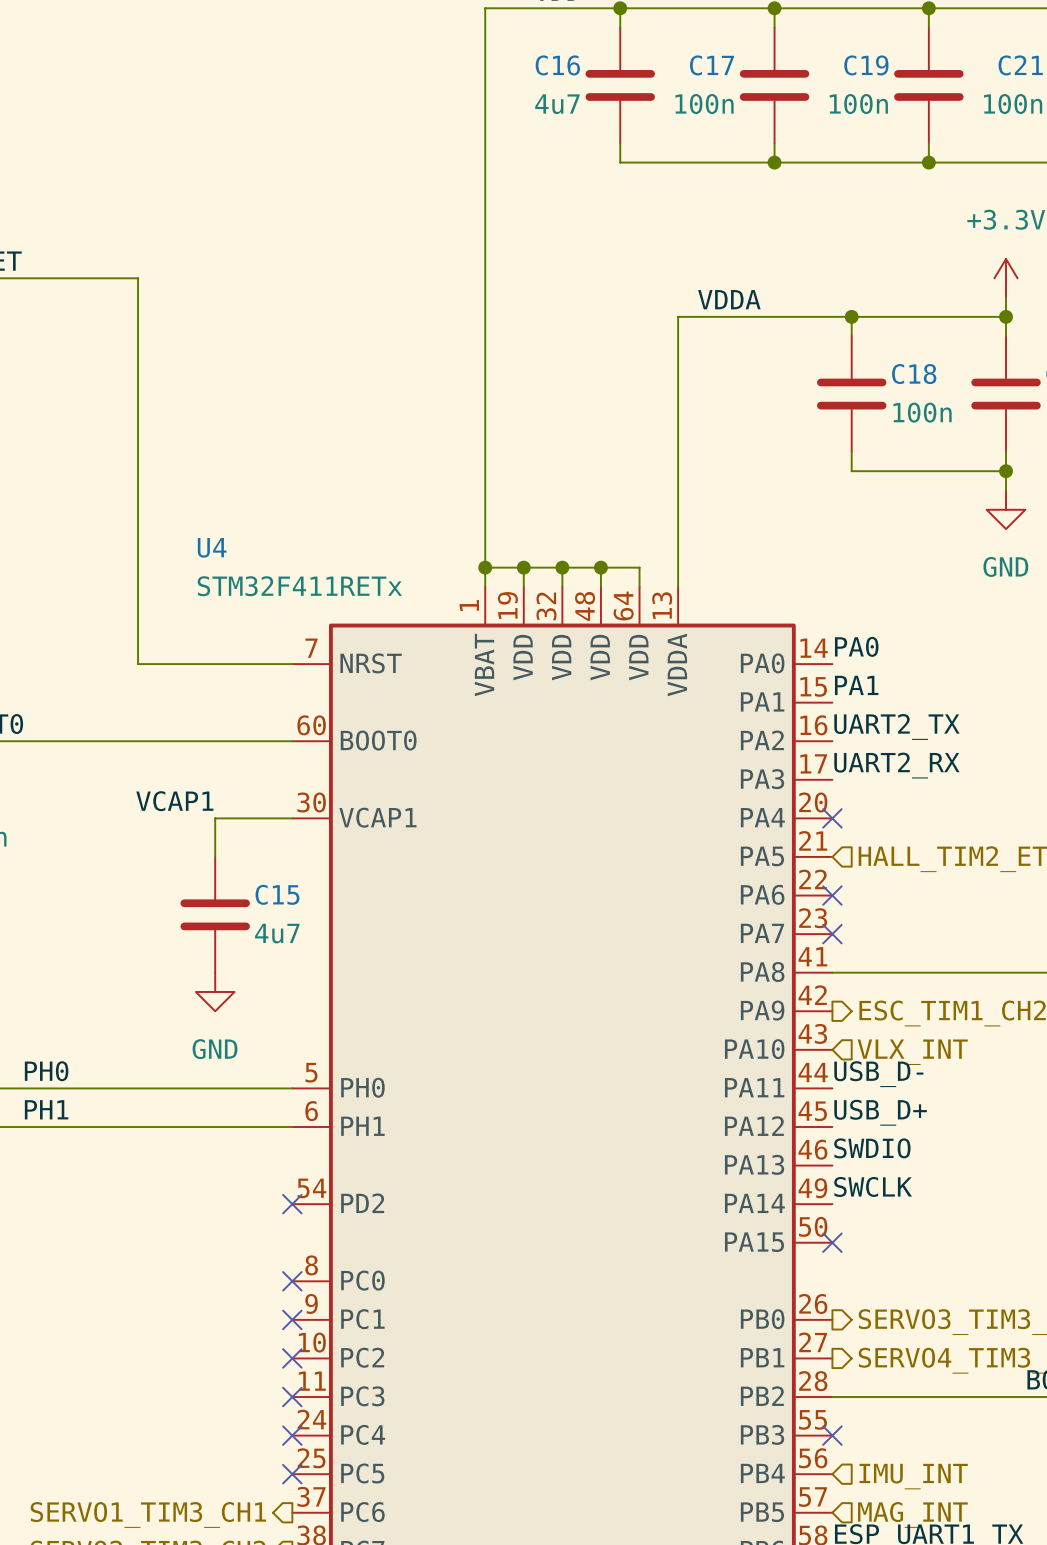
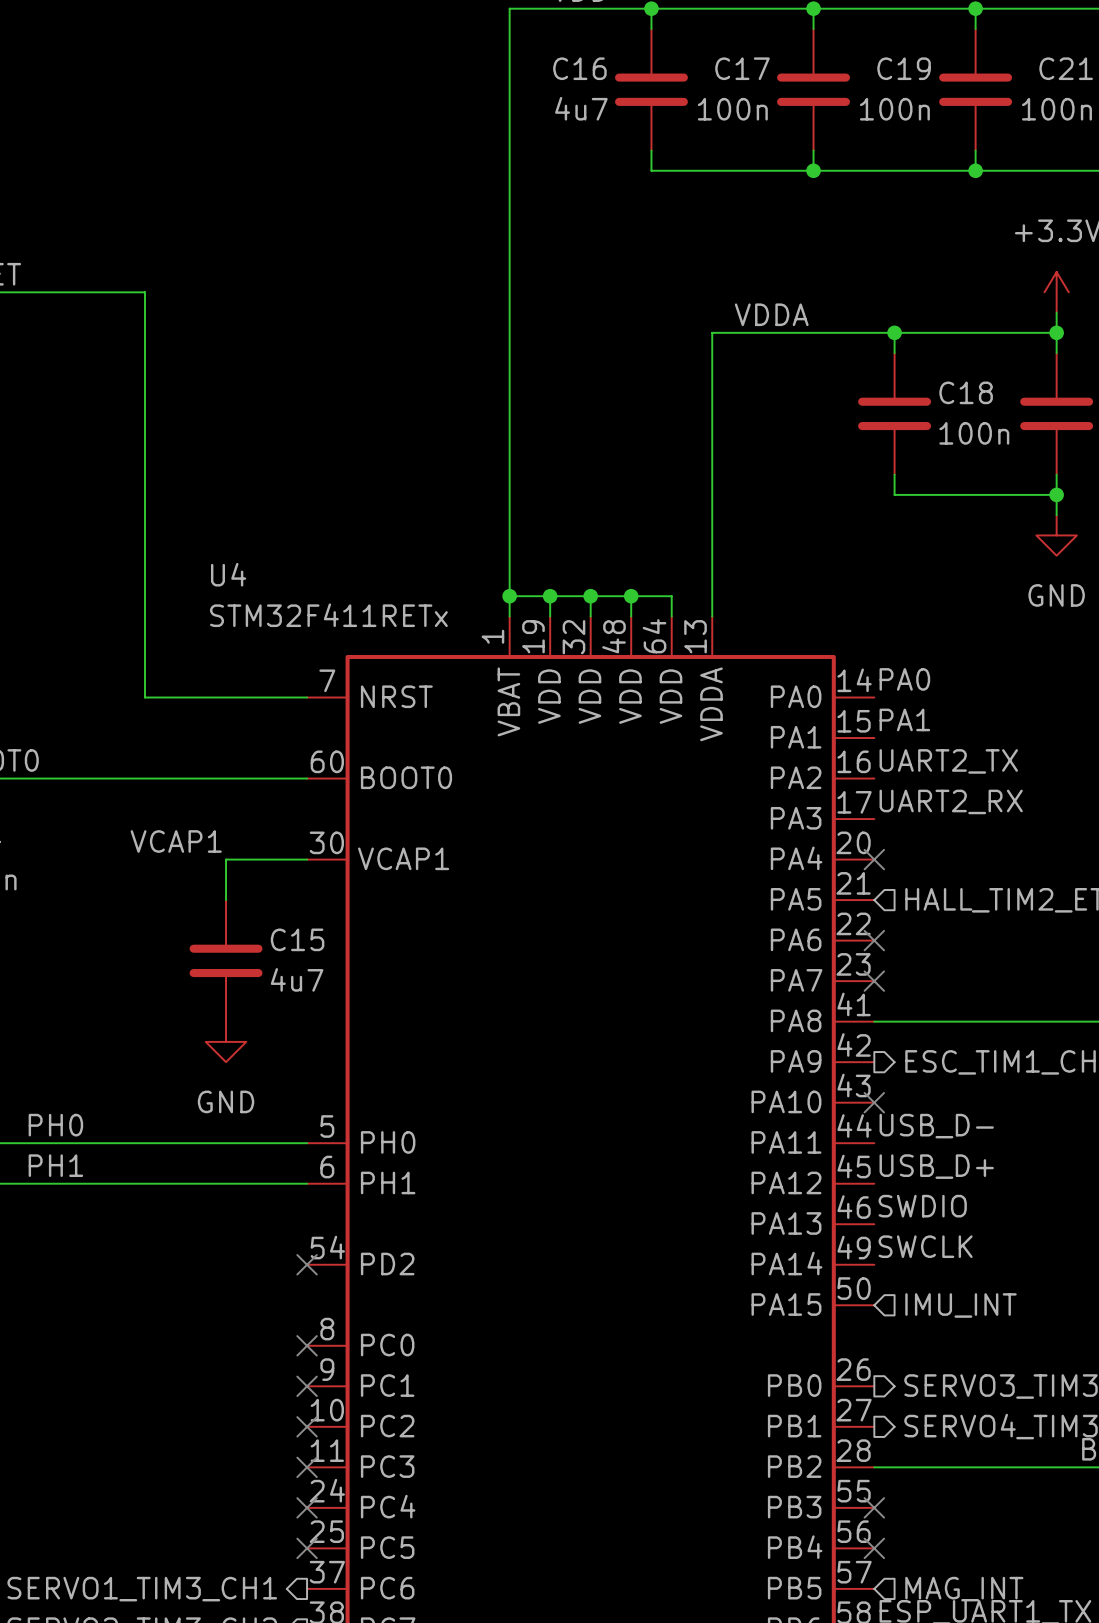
no-connect mark: none -> (874, 1102)
hierarchical label: VLX_INT (912, 1052) -> none
no-connect mark: (832, 1242) -> none
no-connect mark: none -> (874, 1548)
hierarchical label position: IMU_INT (913, 1476) -> IMU_INT (960, 1305)

